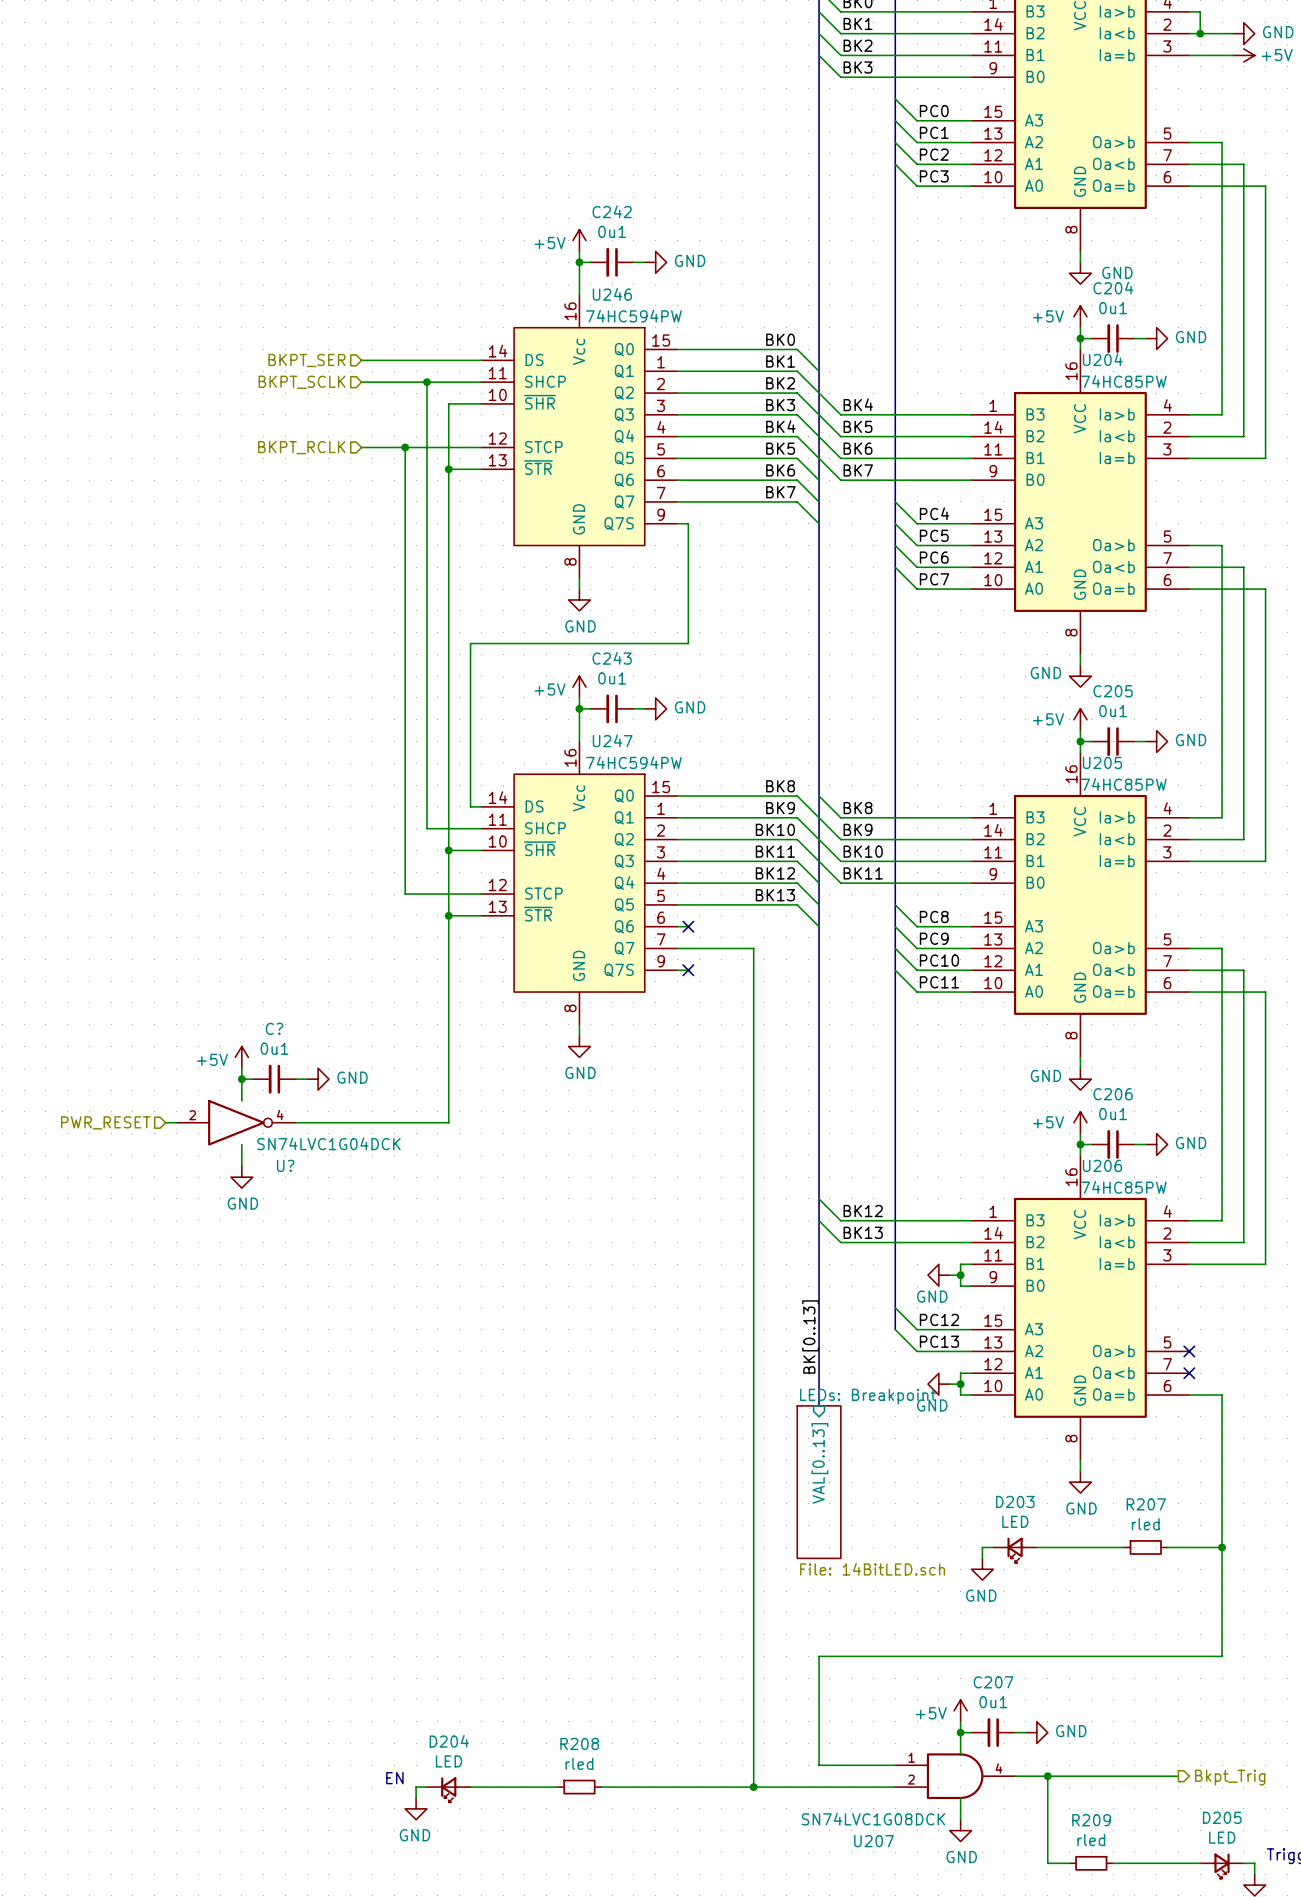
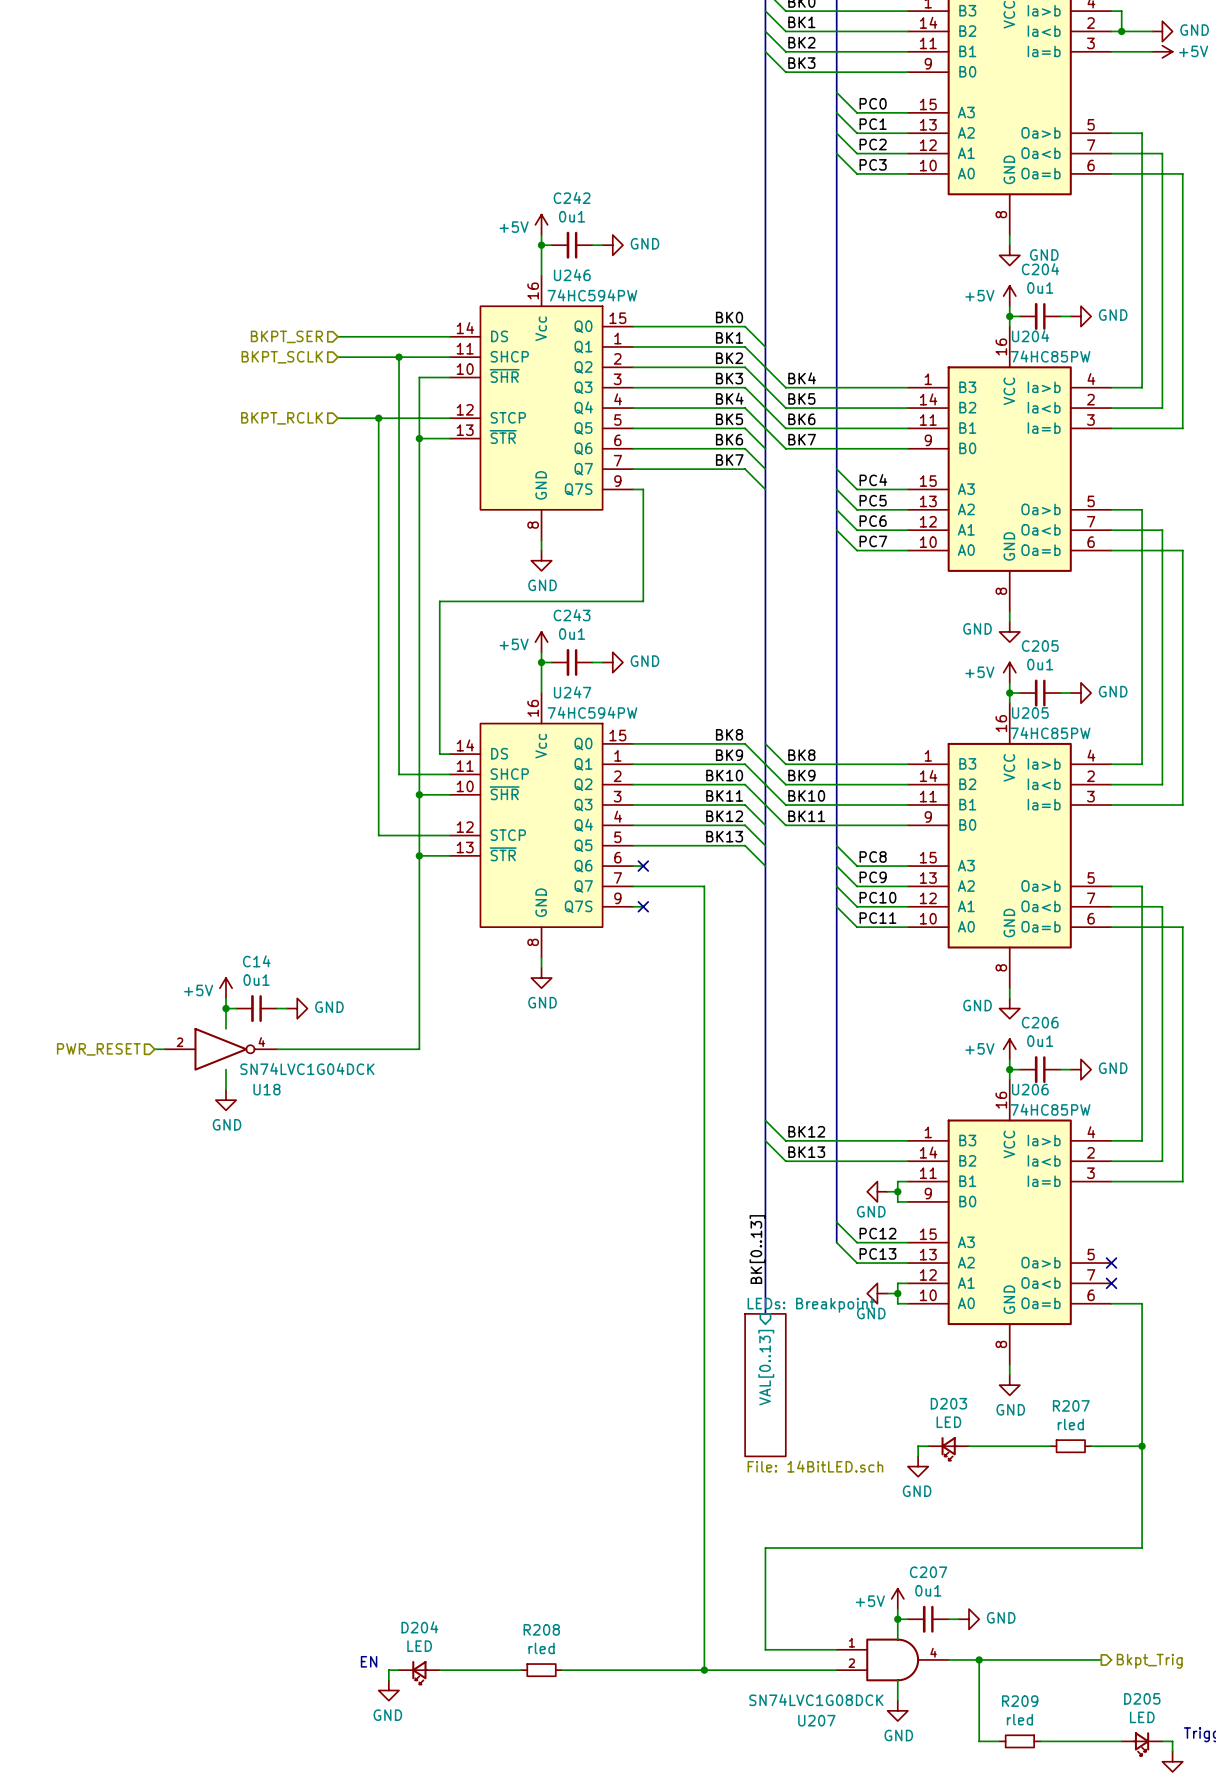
C? name: C? (274, 1028) -> C14 (256, 961)
U? name: U? (285, 1165) -> U18 (266, 1089)

